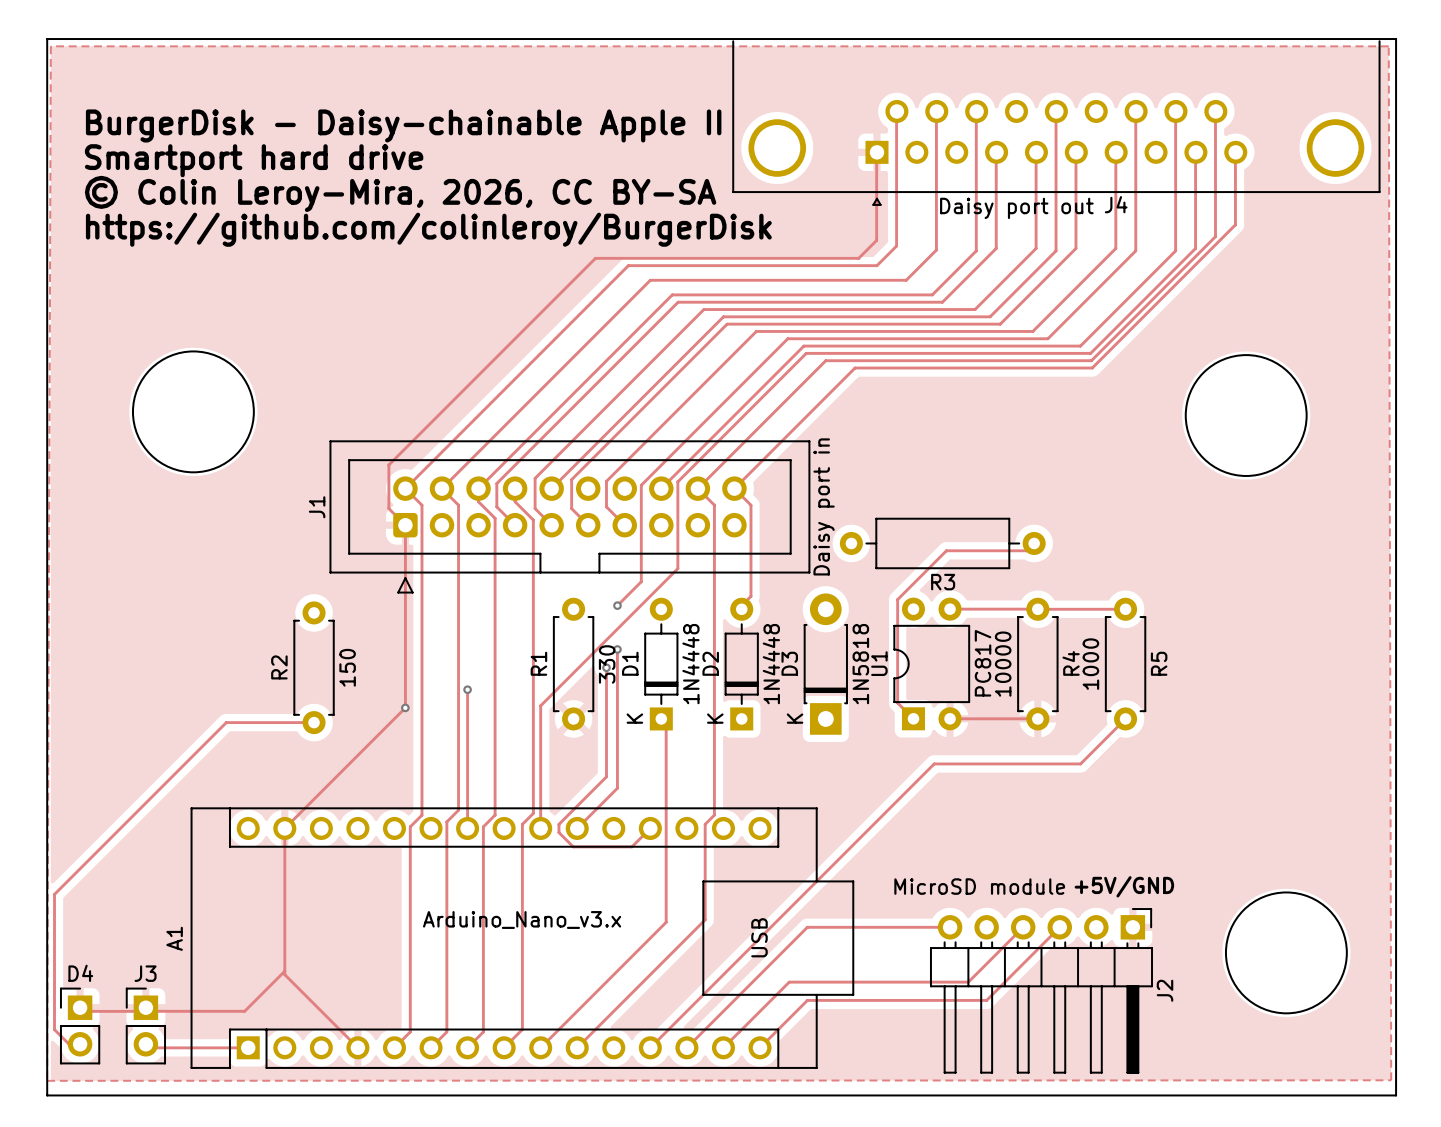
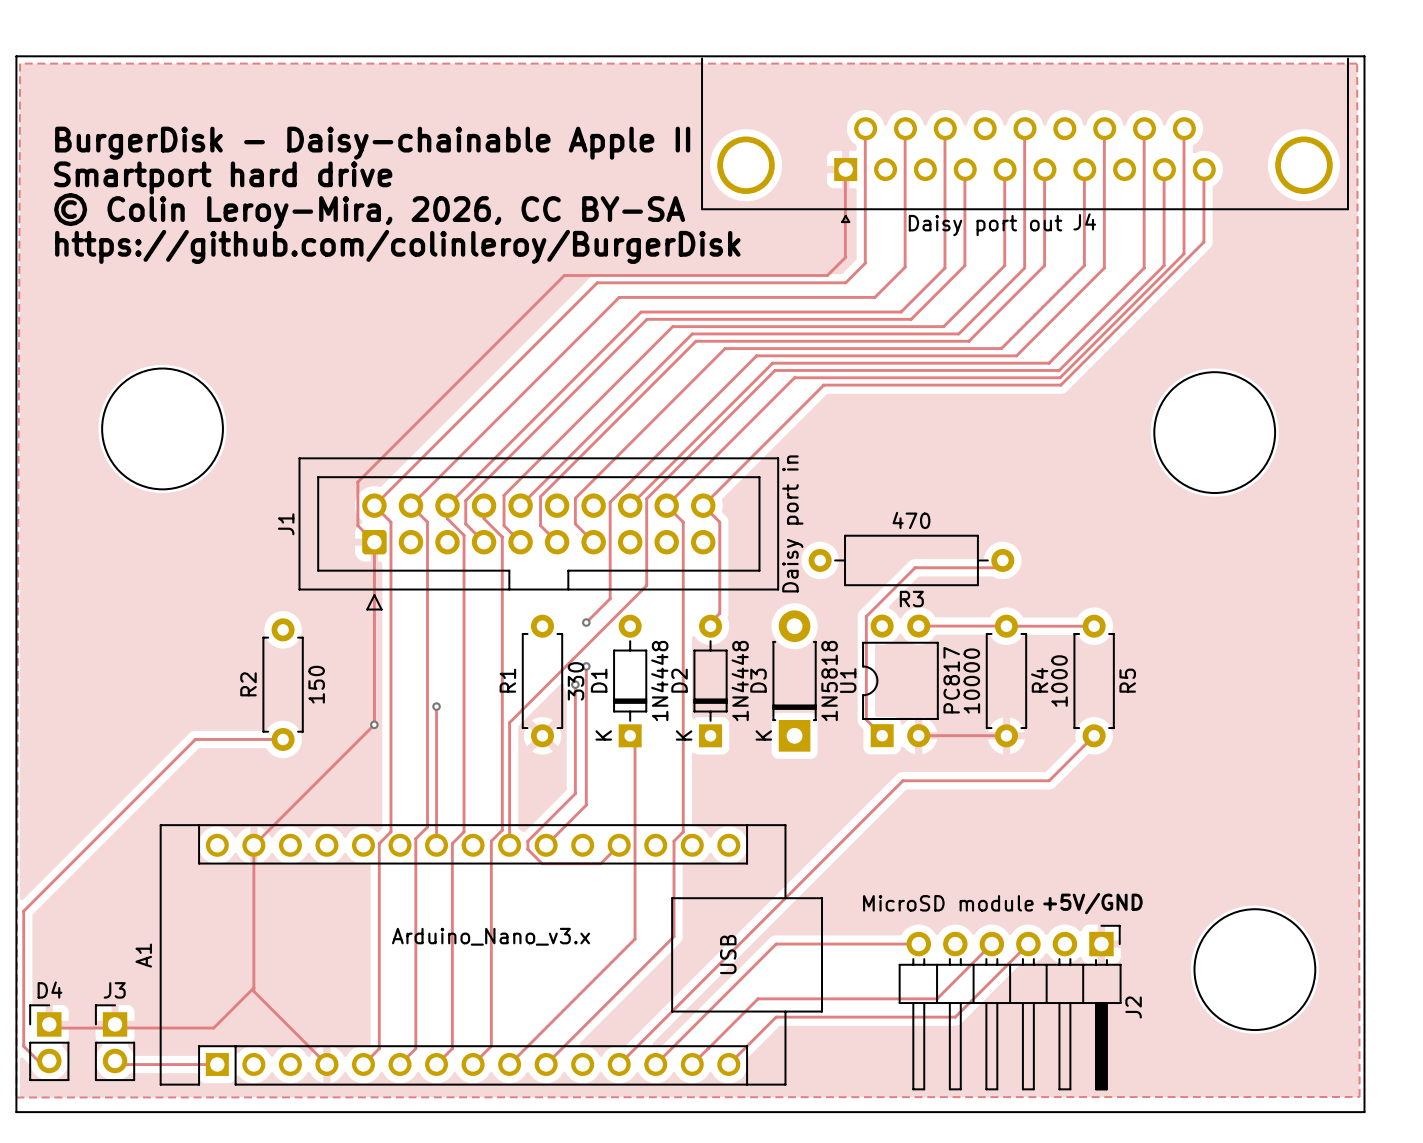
R3 value: none -> 470 (911, 520)

